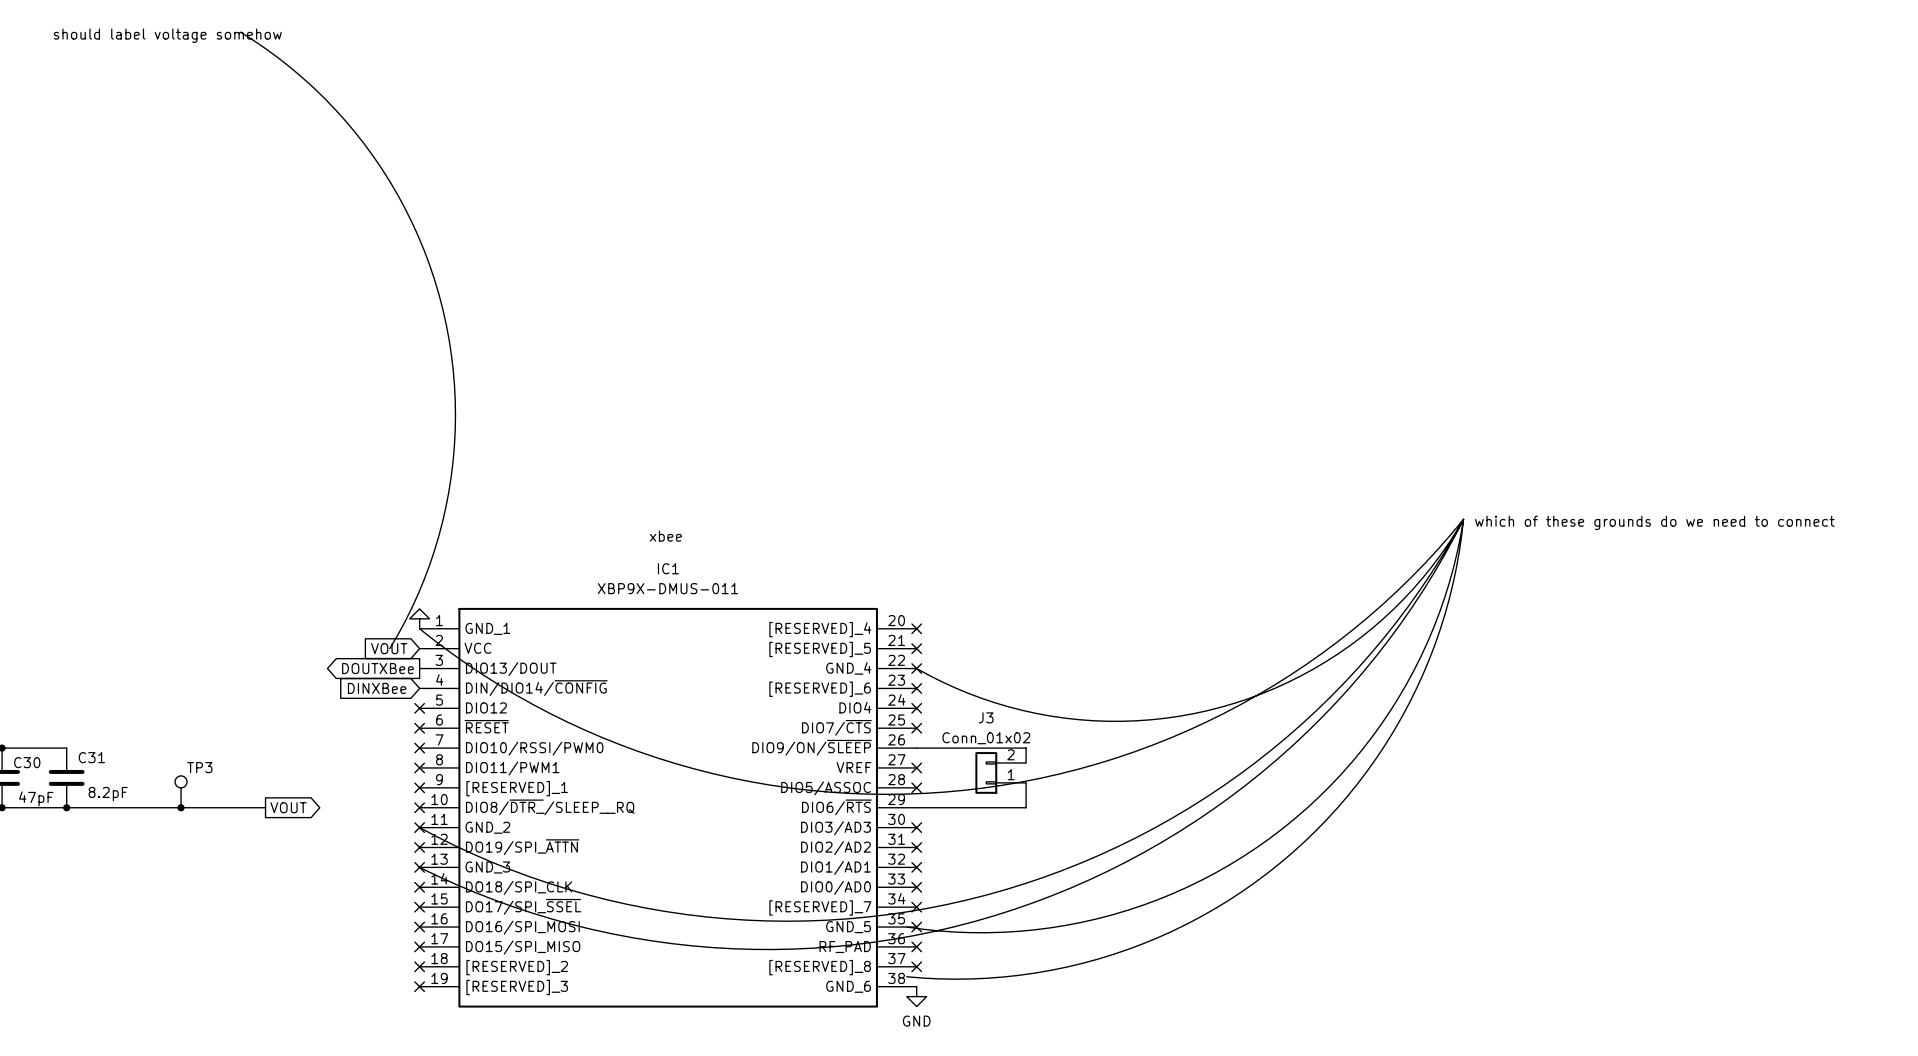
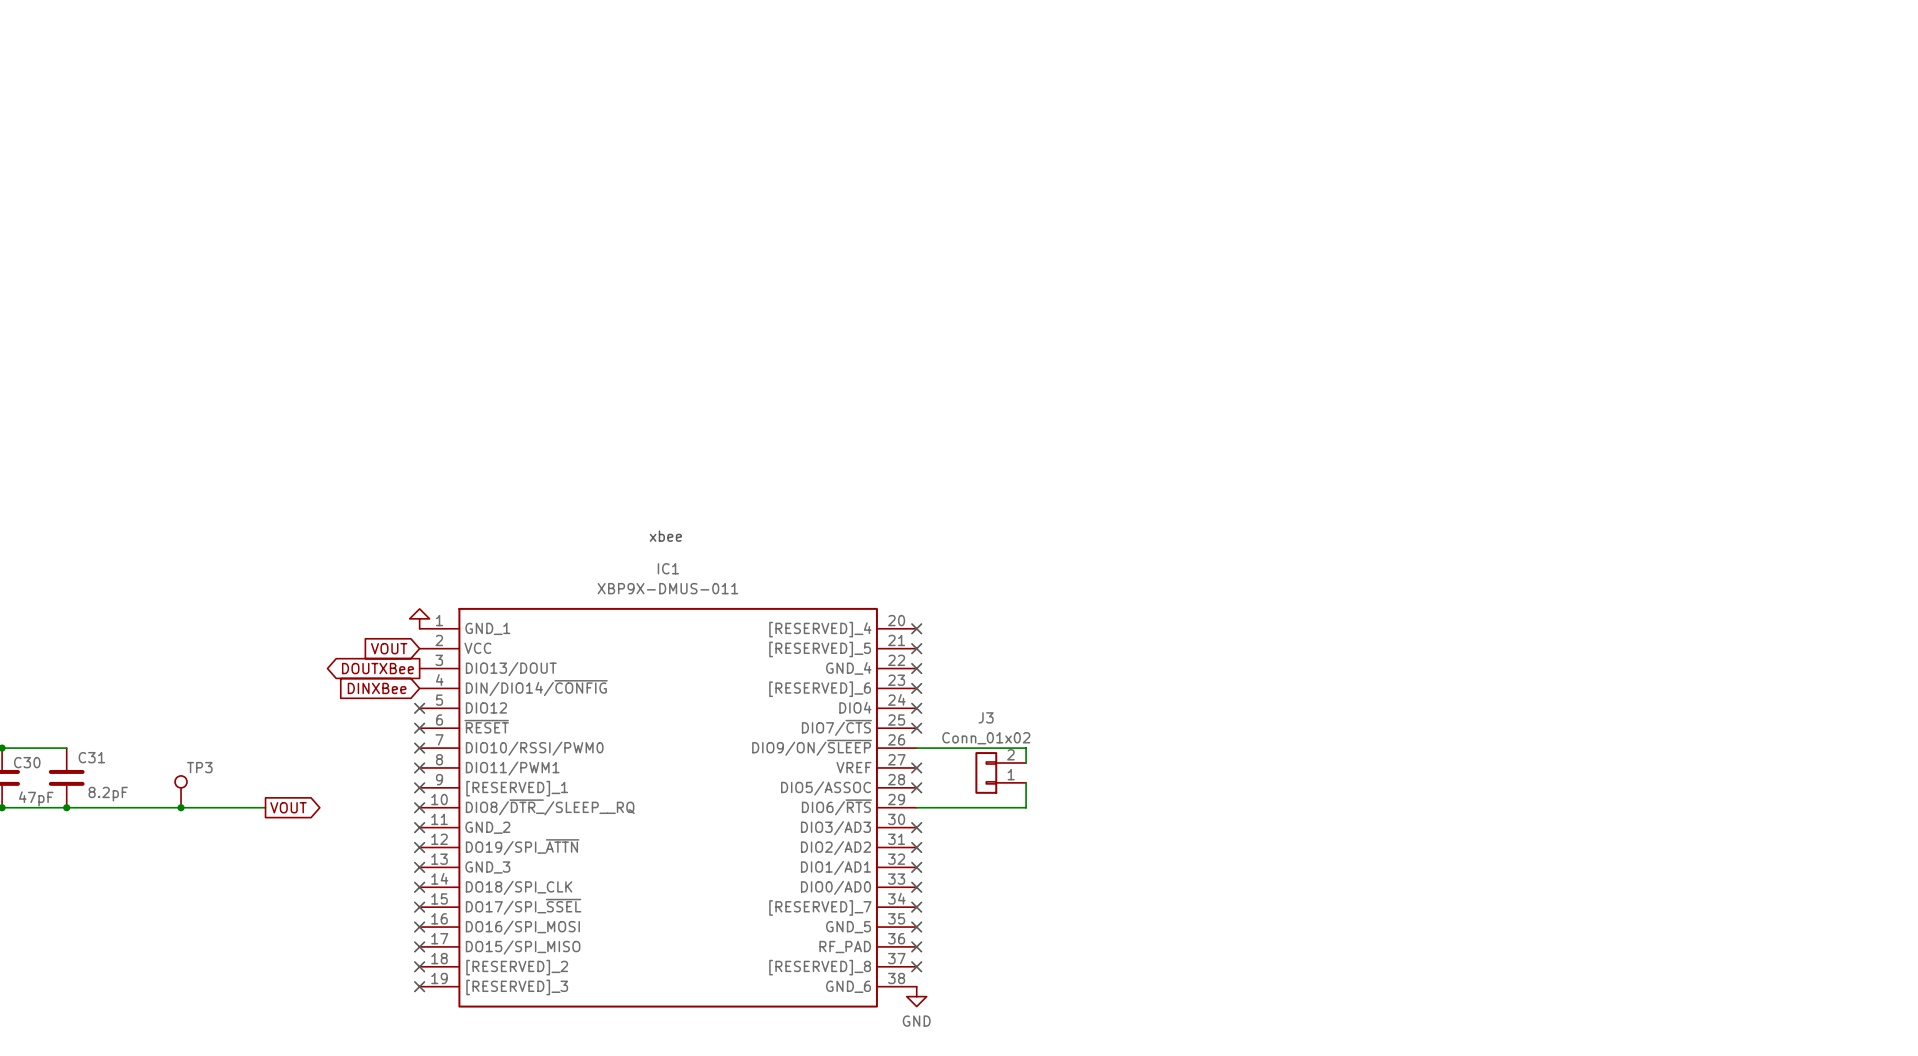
line: (240, 32) (266, 49) (302, 77) (335, 109) (364, 144) (390, 182) (412, 223) (429, 265) (442, 309) (451, 354) (455, 400) (454, 446) (448, 491) (438, 536) (423, 580) (404, 622) (389, 648) -> none
text: should label voltage somehow (167, 35) -> none
line: (1463, 519) (1434, 572) (1388, 640) (1336, 702) (1277, 759) (1229, 797) (1161, 842) (1089, 879) (1013, 909) (954, 926) (875, 942) (793, 949) (712, 947) (651, 940) (571, 924) (494, 899) (419, 867) -> none
line: (1463, 519) (1453, 566) (1439, 612) (1421, 656) (1398, 698) (1371, 737) (1340, 774) (1306, 808) (1269, 838) (1229, 864) (1187, 887) (1142, 905) (1096, 918) (1049, 927) (1002, 932) (954, 932) (906, 927) -> none
line: (1463, 519) (1456, 566) (1445, 613) (1429, 658) (1409, 702) (1385, 744) (1347, 795) (1315, 831) (1279, 863) (1241, 892) (1186, 924) (1142, 944) (1096, 959) (1050, 970) (1002, 977) (954, 979) (906, 976) -> none
line: (1463, 519) (1421, 588) (1372, 651) (1316, 710) (1271, 750) (1206, 797) (1136, 837) (1062, 870) (1005, 889) (946, 904) (867, 917) (786, 921) (706, 916) (626, 904) (548, 883) (473, 854) (419, 827) -> none
line: (1463, 519) (1411, 577) (1368, 616) (1307, 663) (1240, 704) (1170, 737) (1097, 763) (1040, 778) (964, 790) (886, 794) (809, 790) (732, 778) (675, 763) (602, 737) (532, 704) (466, 663) (419, 628) -> none
line: (1463, 519) (1440, 555) (1413, 588) (1382, 619) (1360, 637) (1325, 661) (1300, 675) (1261, 693) (1221, 707) (1193, 713) (1150, 719) (1107, 721) (1065, 718) (1022, 710) (995, 702) (955, 687) (916, 668) -> none
text: which of these grounds do we need to connect (1654, 522) -> none

